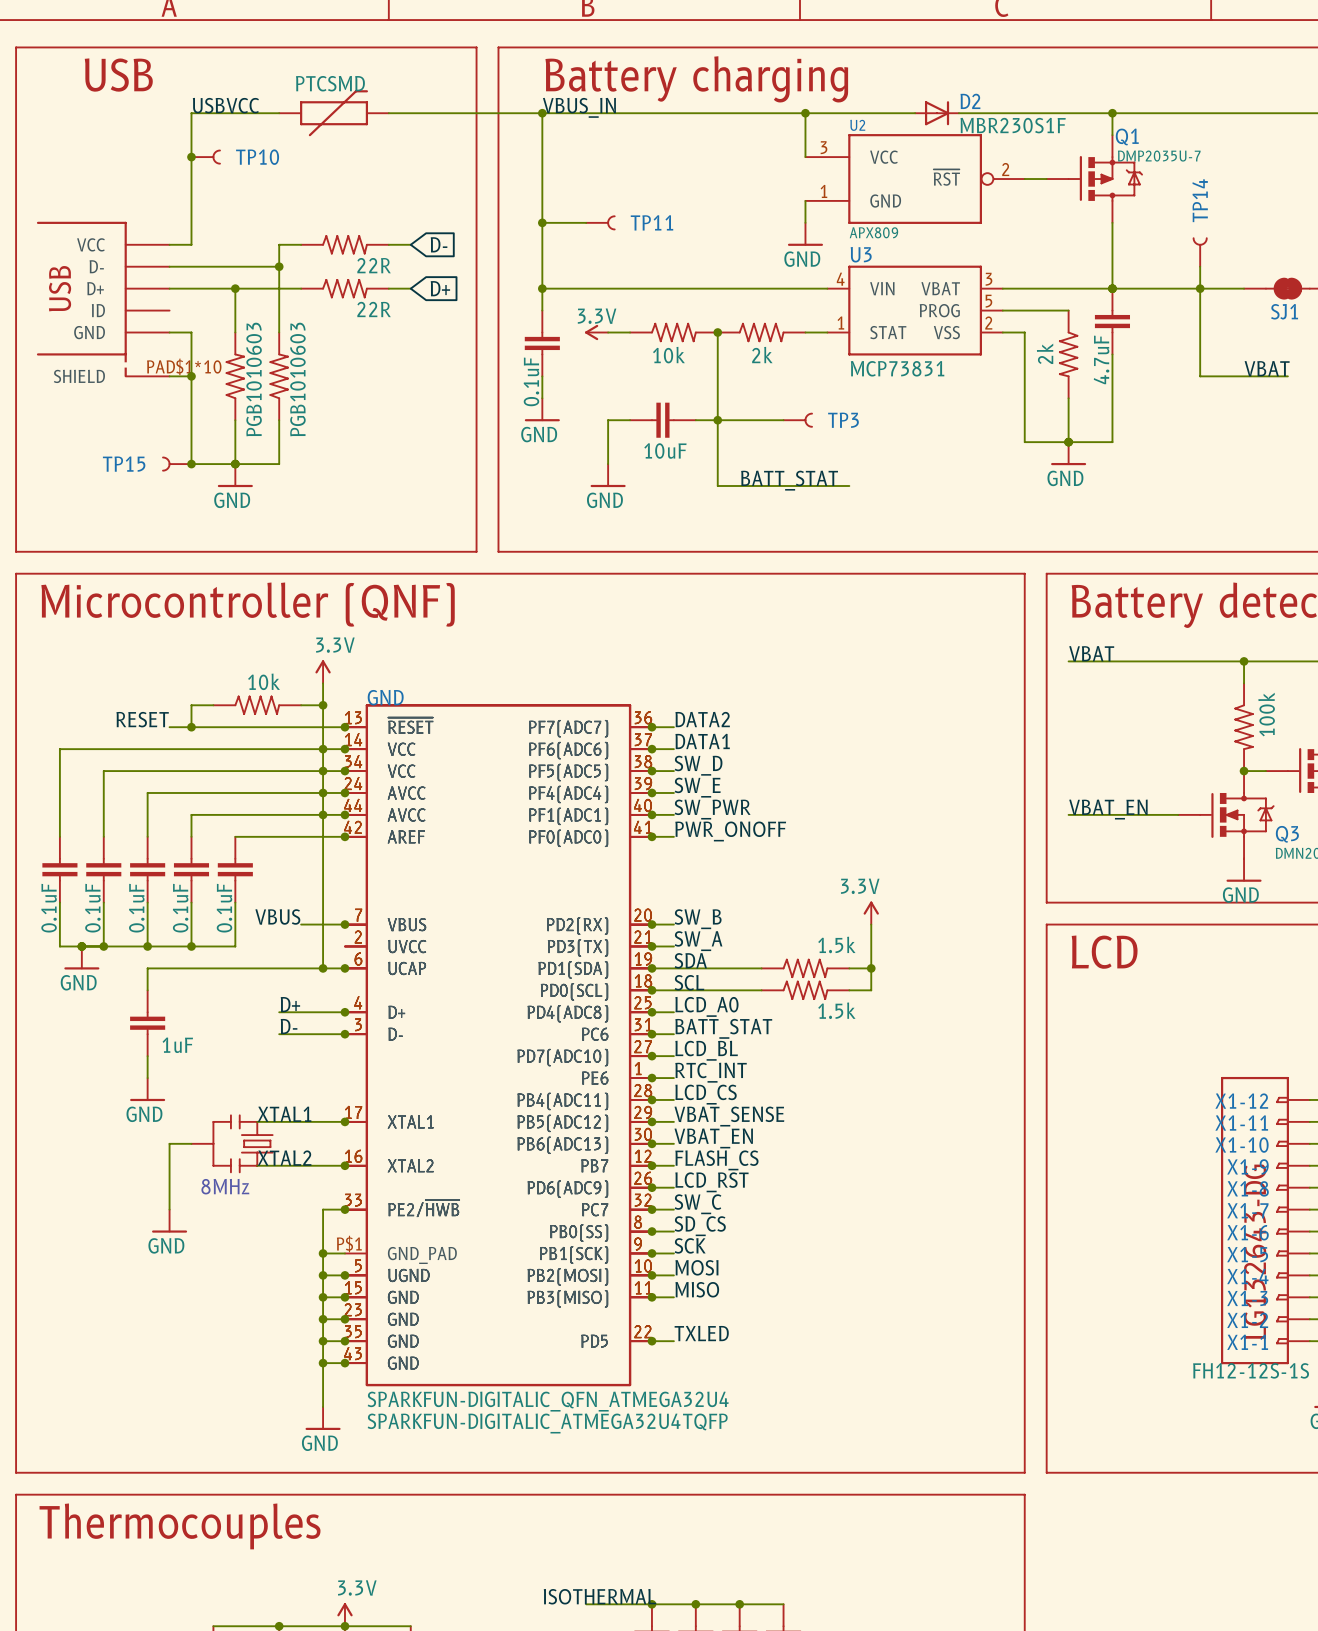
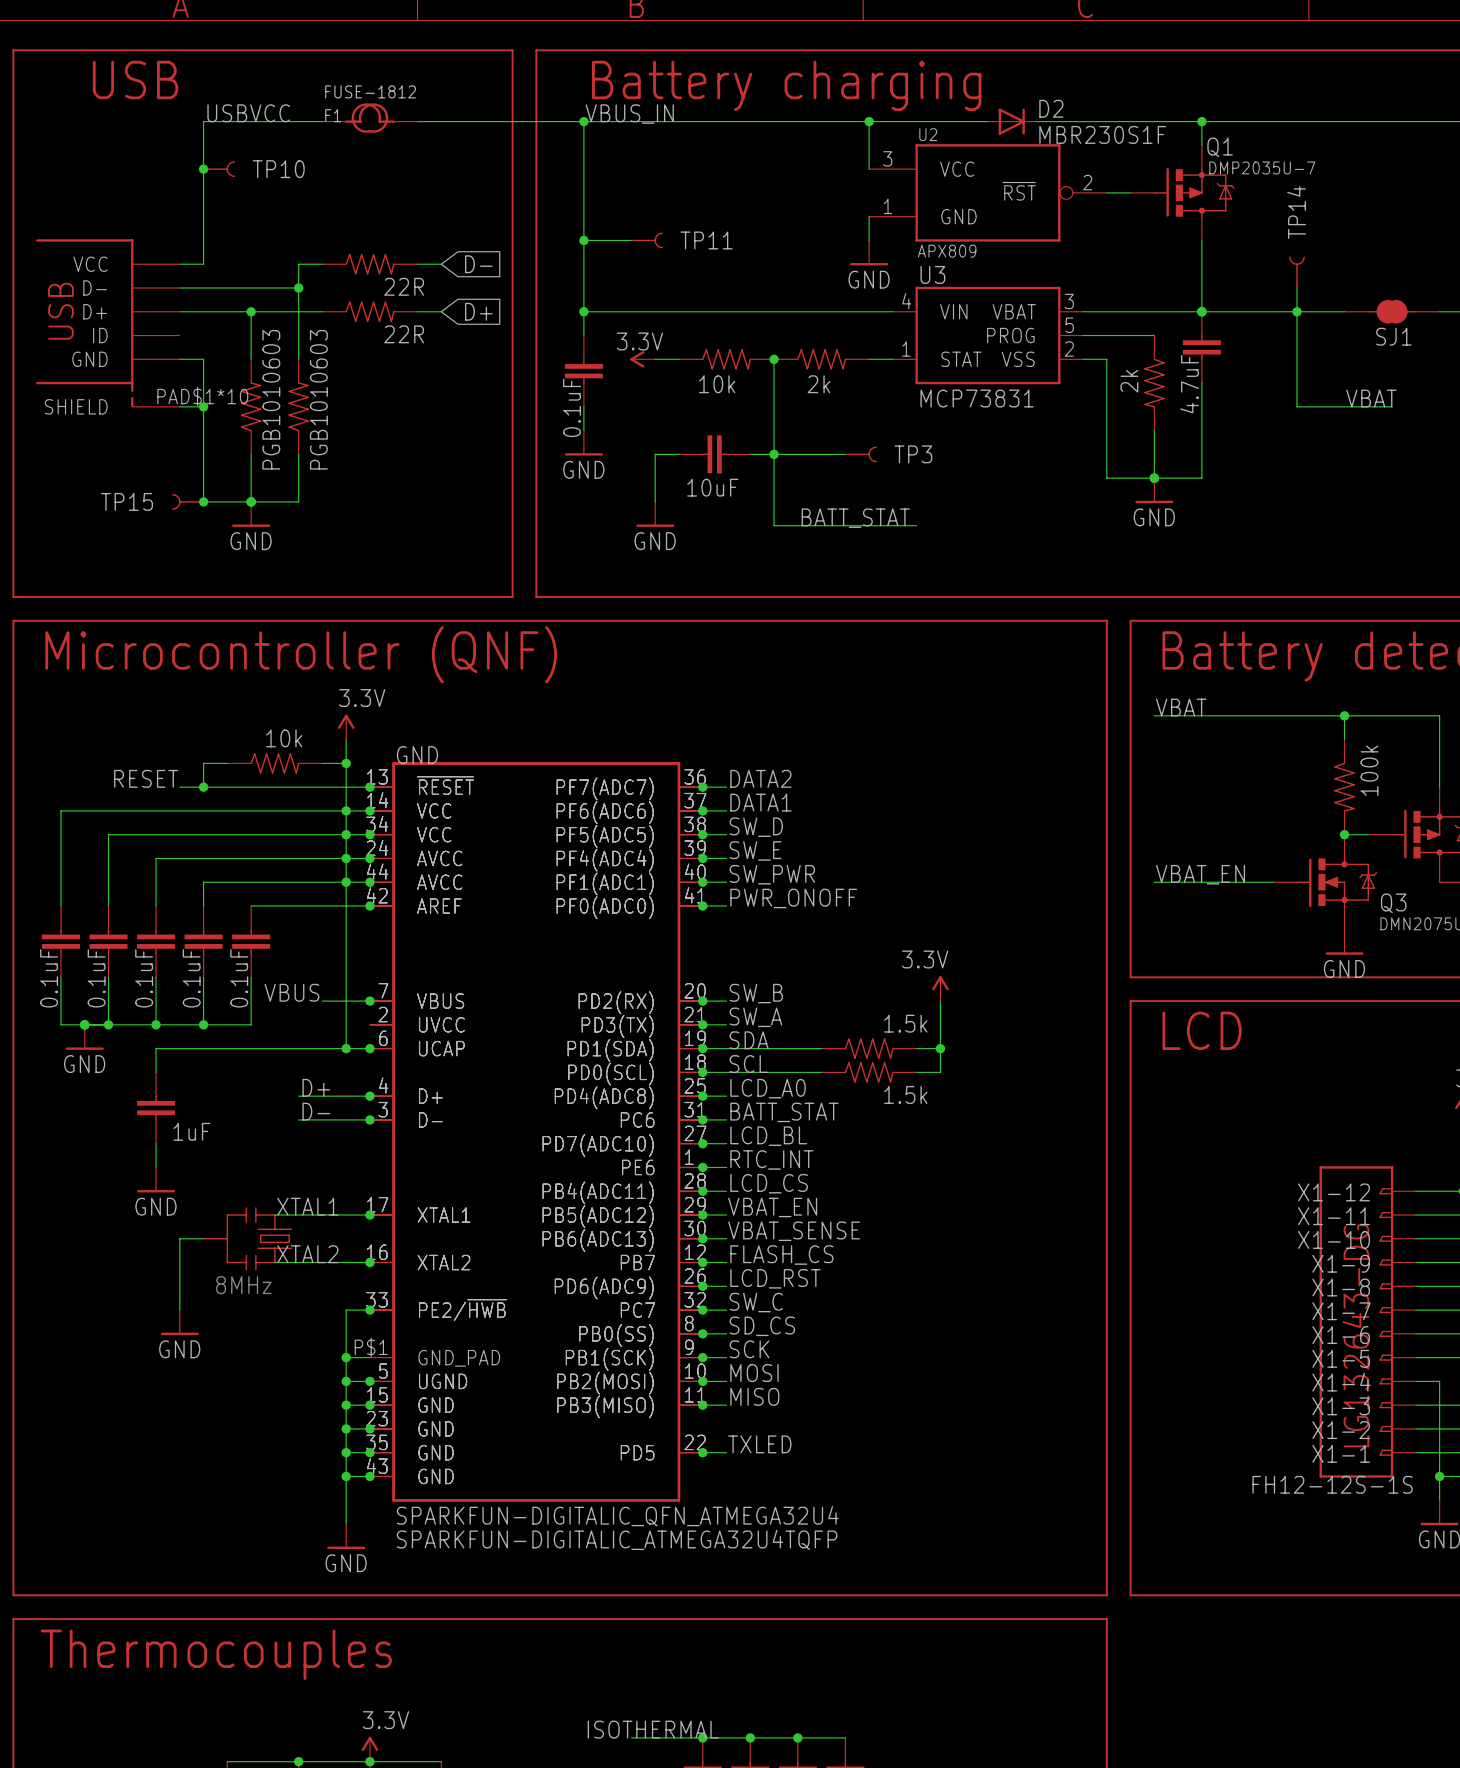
F1: none -> FUSE-1812 (369, 118)
part: PTCSMD (334, 113) -> none
label: VBAT_SENSE (729, 1116) -> VBAT_EN (772, 1207)
label: VBAT_EN (713, 1138) -> VBAT_SENSE (794, 1231)

